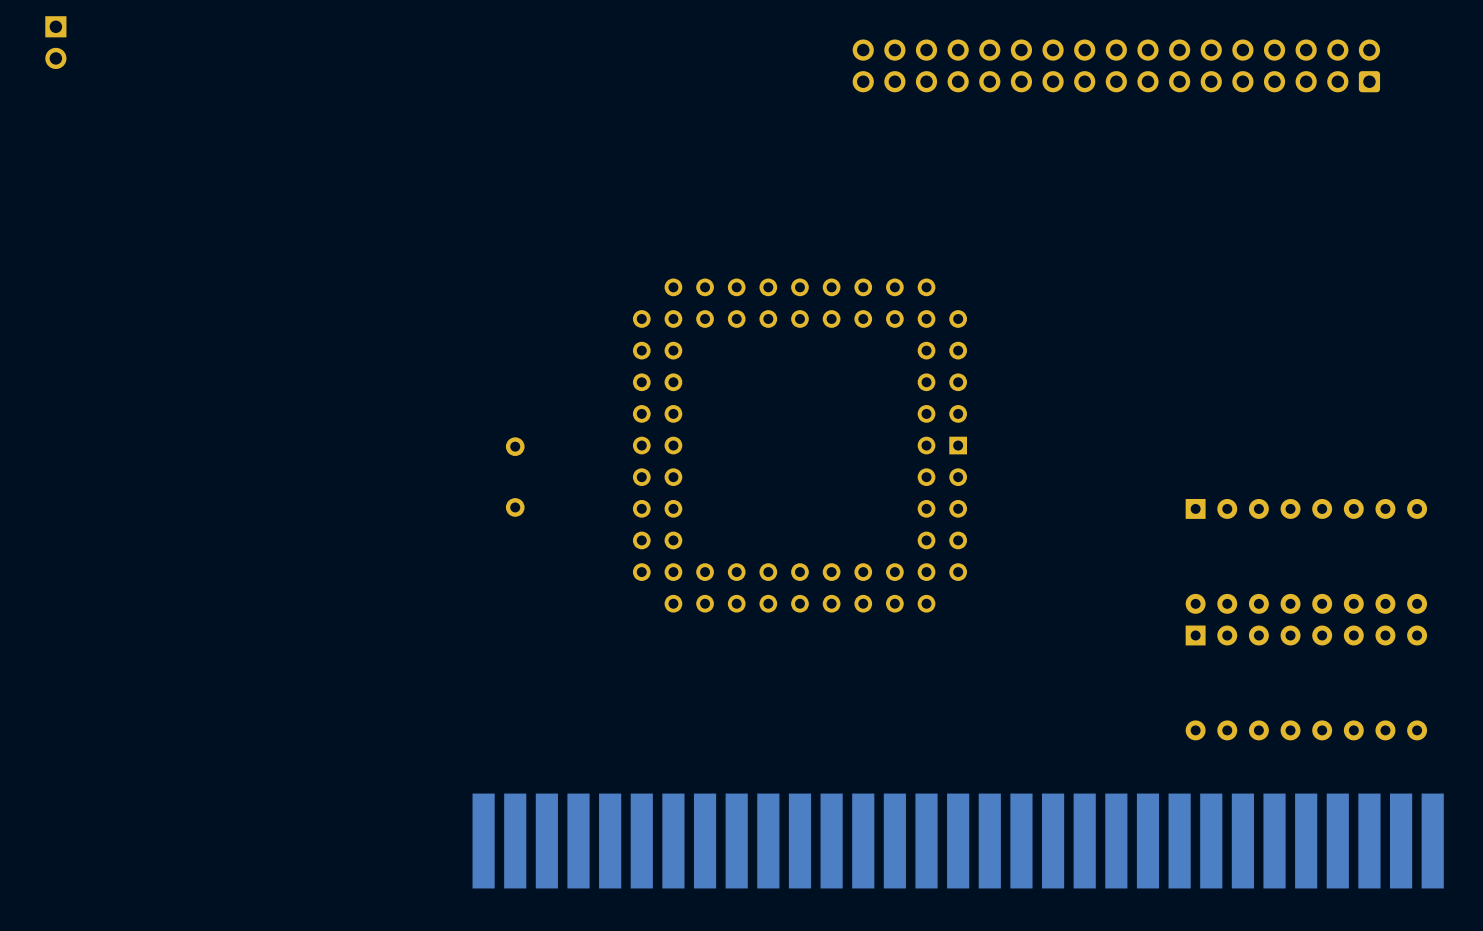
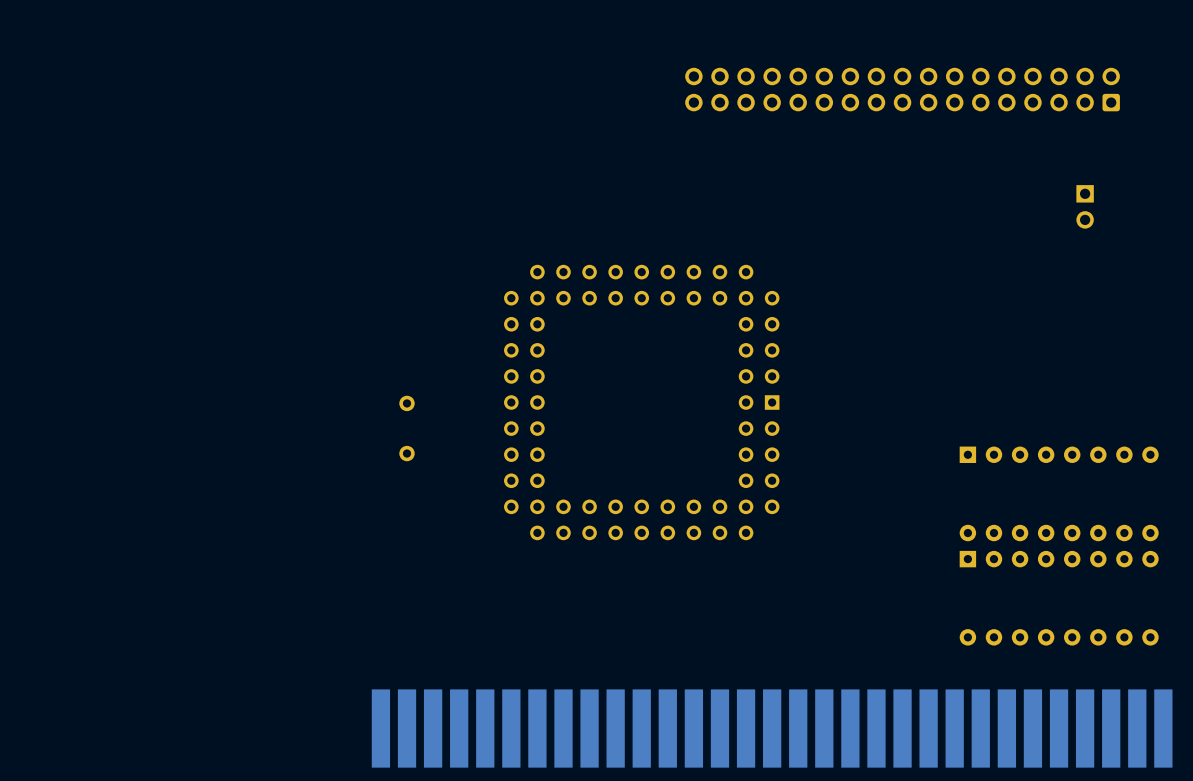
part: (55, 42) -> none
part: none -> (1085, 206)

